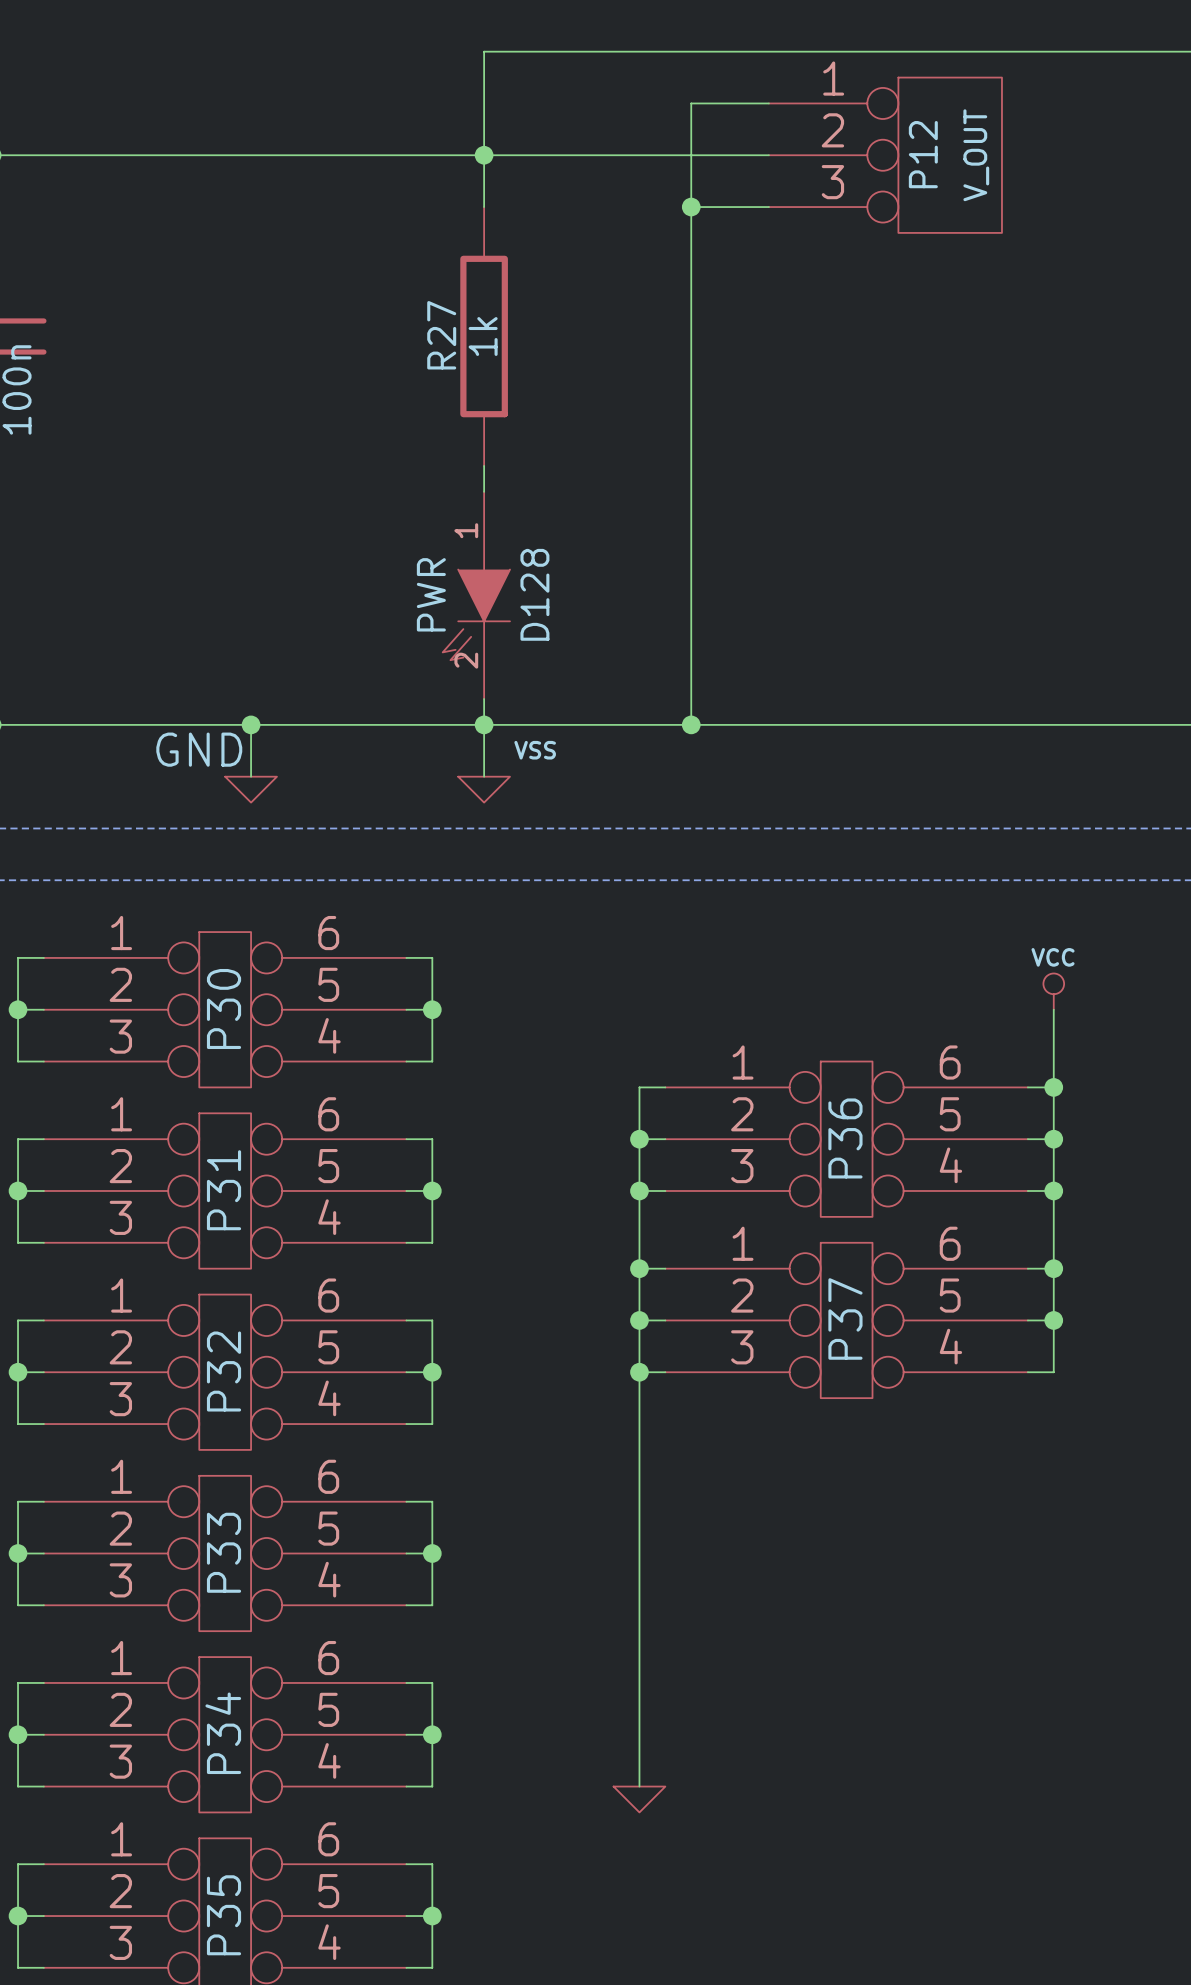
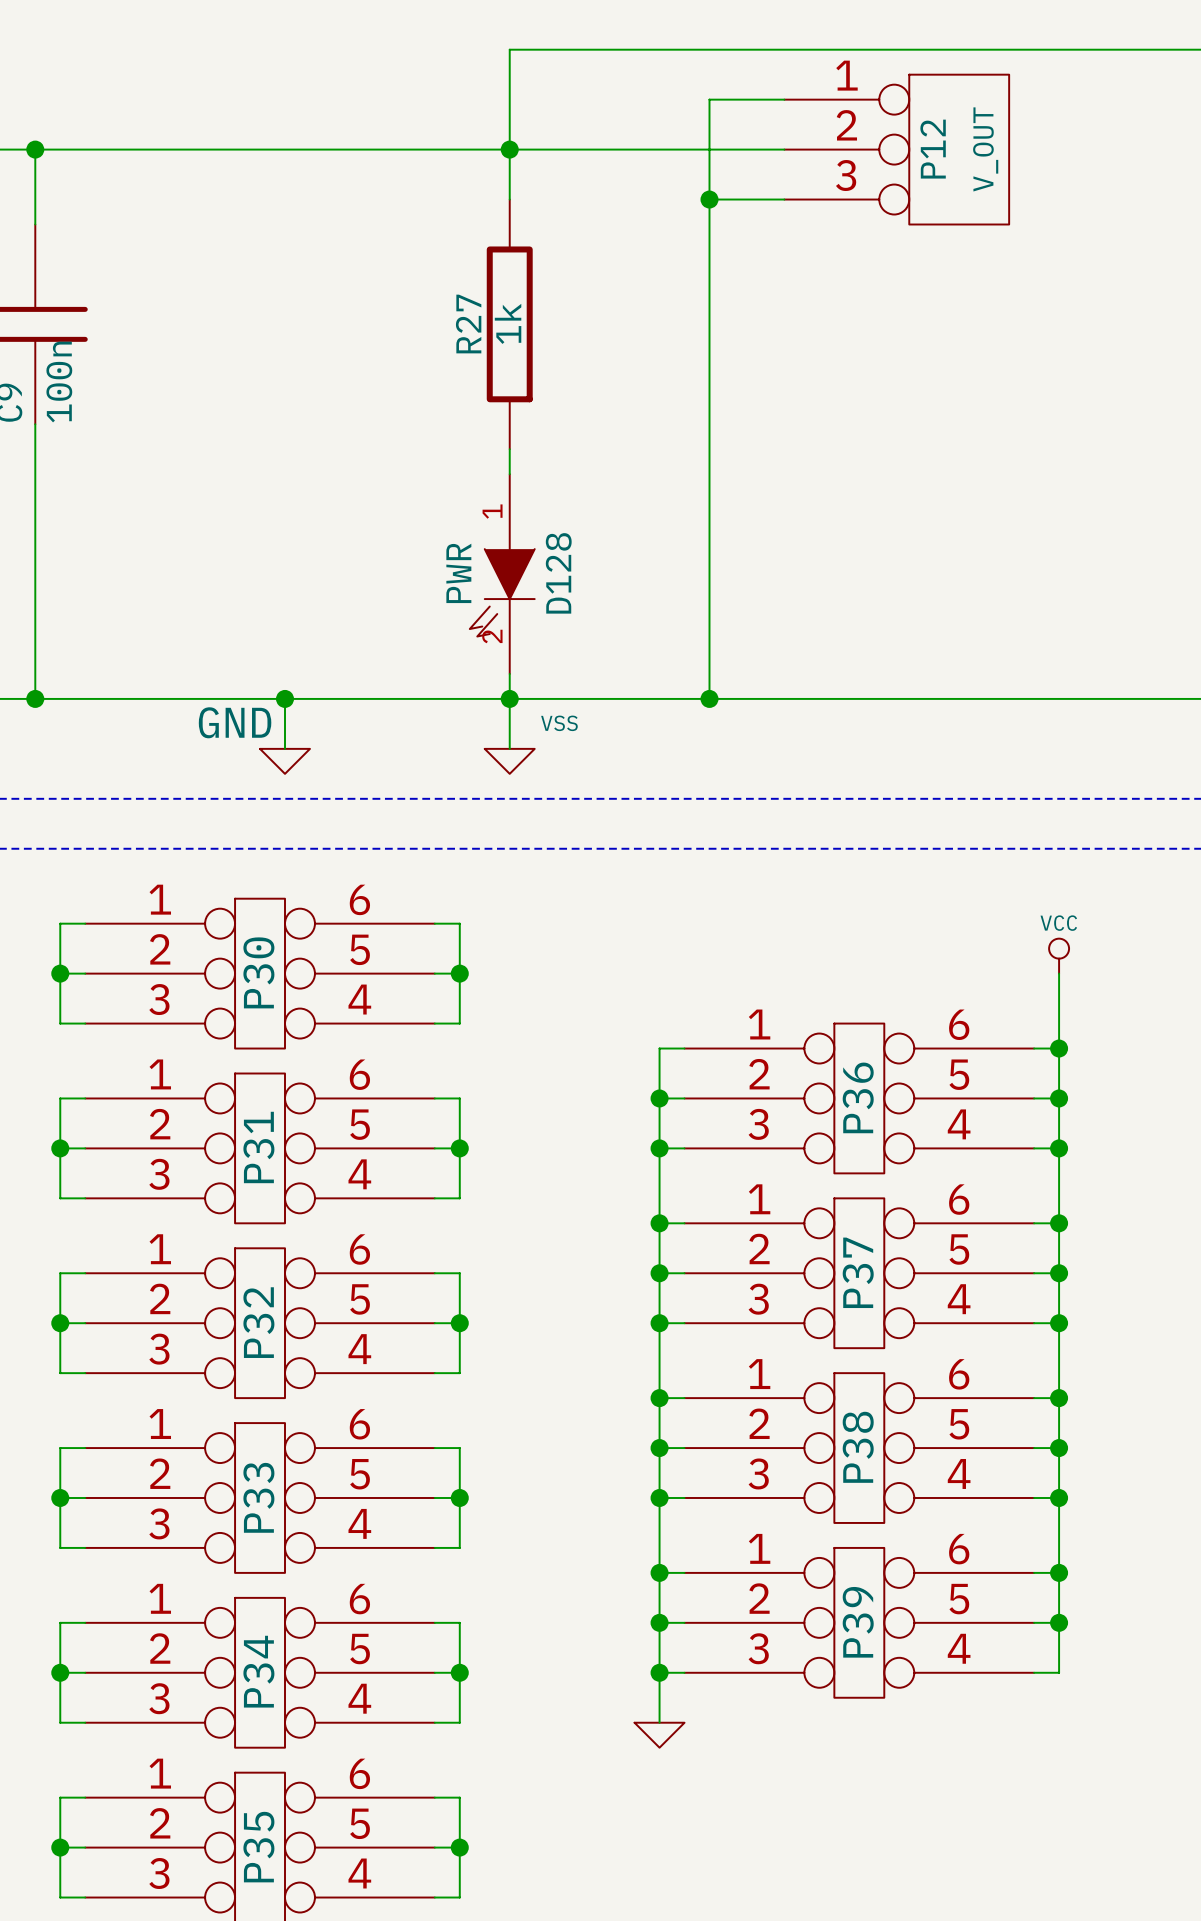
wire: none -> (1059, 1323) (1059, 1672) (1034, 1672)
junction: none -> (1059, 1323)
wire: none -> (659, 1398) (684, 1398)
junction: none -> (659, 1398)
wire: none -> (1034, 1398) (1059, 1398)
junction: none -> (1059, 1398)
wire: none -> (659, 1448) (684, 1448)
junction: none -> (659, 1448)
P38: none -> (859, 1448)
wire: none -> (1034, 1448) (1059, 1448)
junction: none -> (1059, 1448)
wire: none -> (659, 1497) (684, 1497)
junction: none -> (659, 1497)
wire: none -> (1034, 1497) (1059, 1497)
junction: none -> (1059, 1497)
wire: none -> (659, 1572) (684, 1572)
junction: none -> (659, 1572)
wire: none -> (1034, 1572) (1059, 1572)
junction: none -> (1059, 1572)
wire: none -> (659, 1622) (684, 1622)
junction: none -> (659, 1622)
P39: none -> (859, 1622)
wire: none -> (1034, 1622) (1059, 1622)
junction: none -> (1059, 1622)
wire: none -> (659, 1672) (684, 1672)
junction: none -> (659, 1672)

